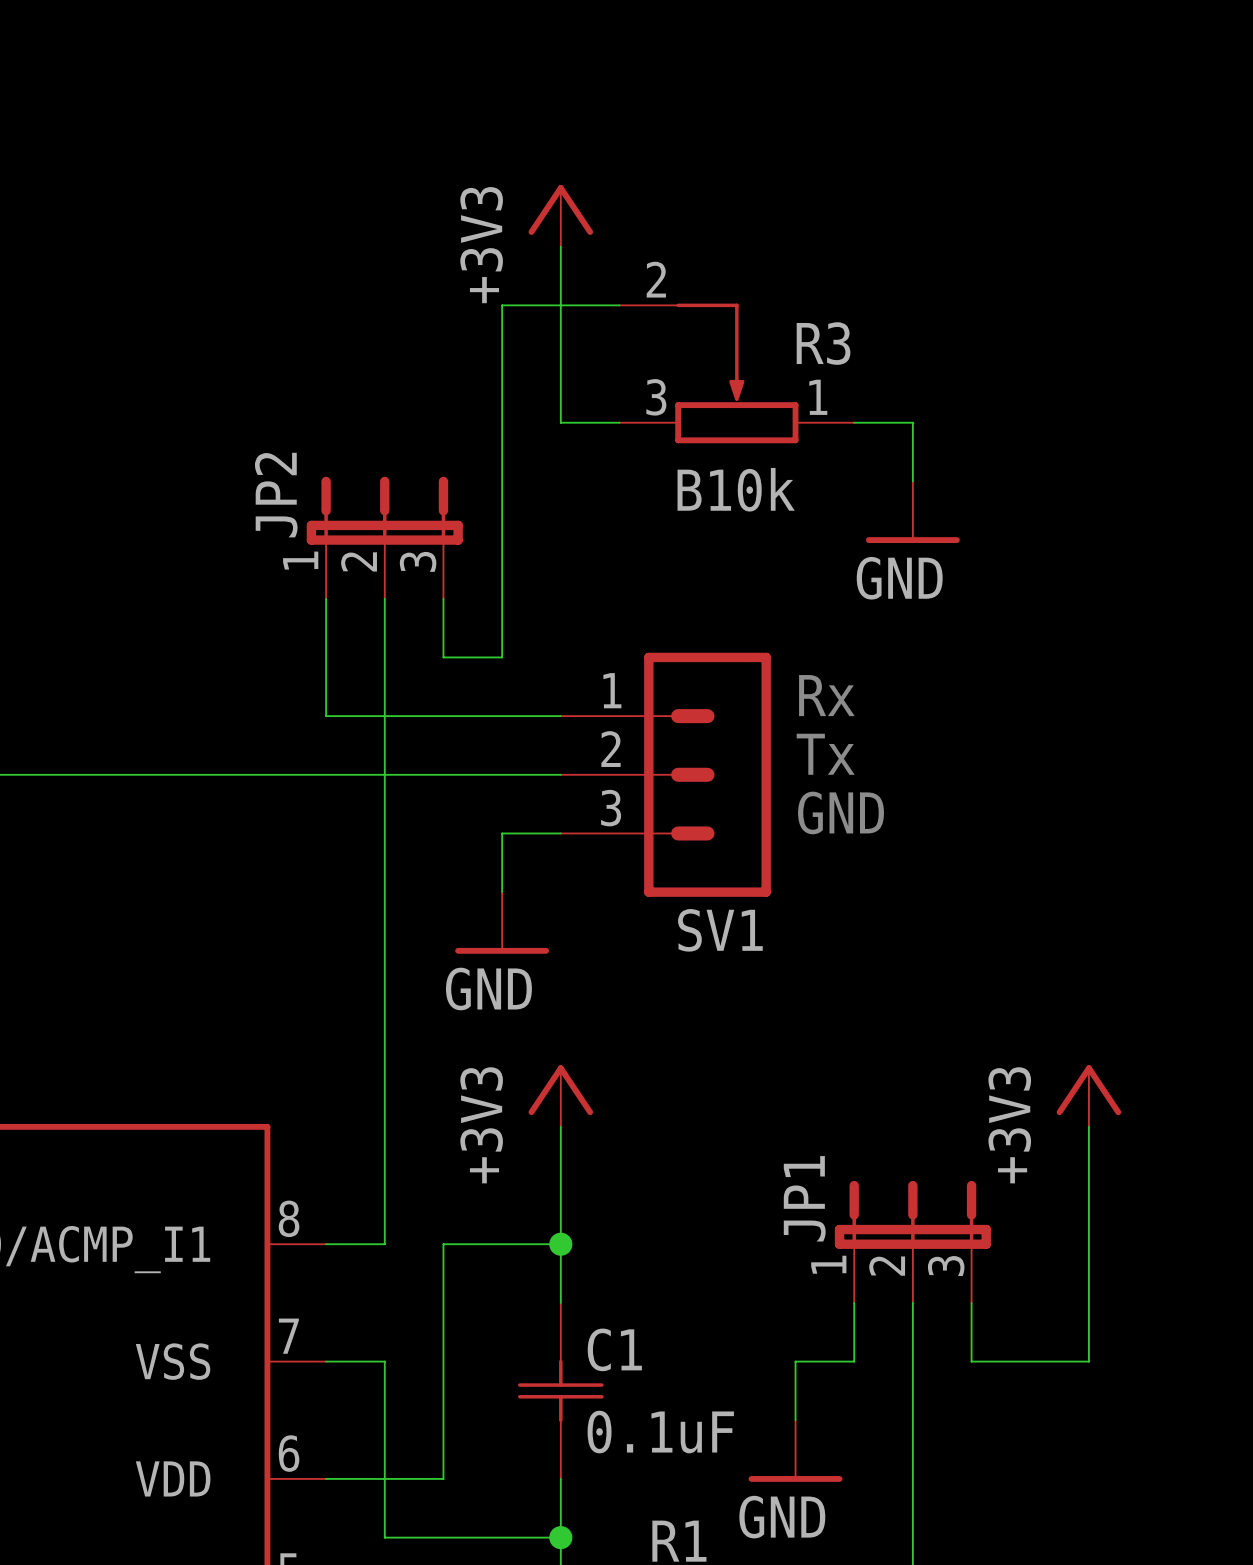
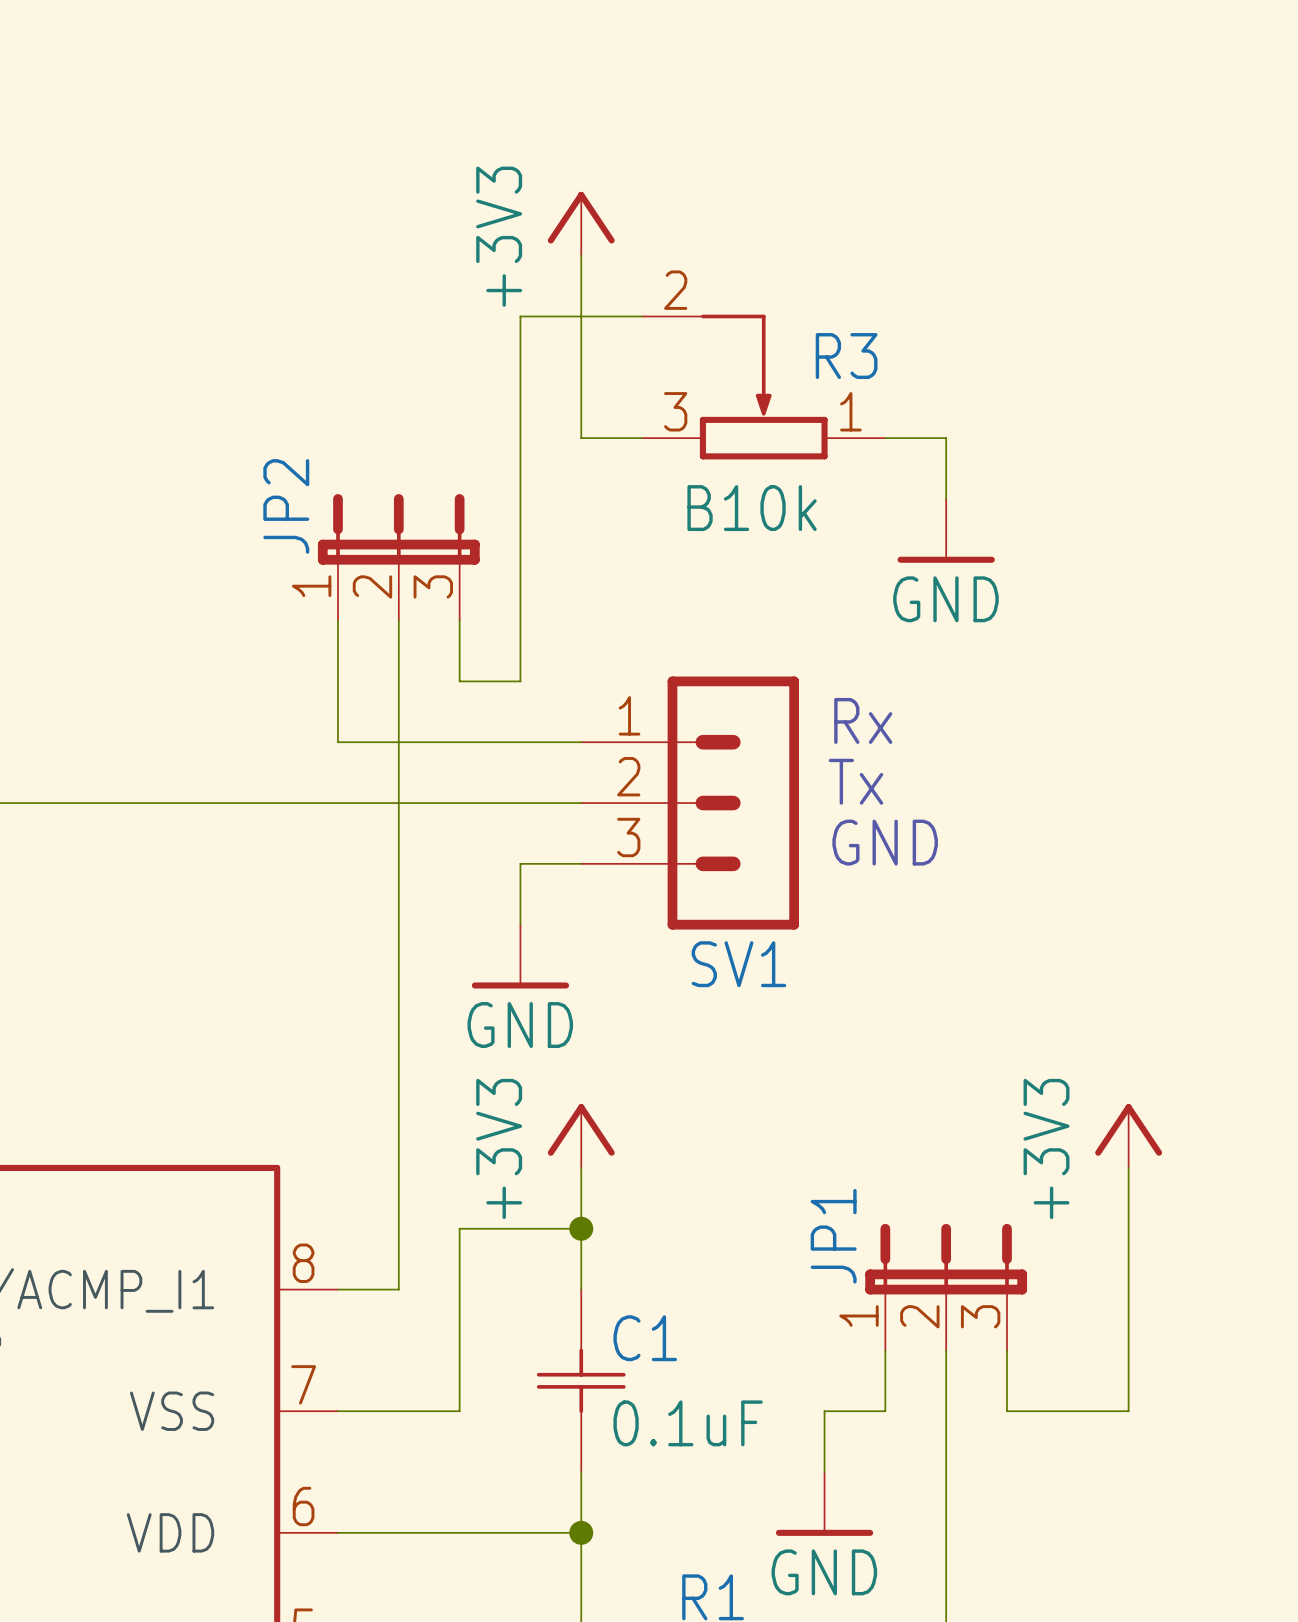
wire: (443, 1244) (560, 1244) (560, 1302) -> (459, 1289) (459, 1228) (581, 1228)
junction position: (560, 1244) -> (581, 1228)
wire: (384, 1361) (384, 1537) (560, 1537) -> (398, 1411) (459, 1411)
wire: (443, 1361) (443, 1478) -> (581, 1472) (581, 1532) (459, 1532)
C1 position: (560, 1390) -> (581, 1380)
junction position: (560, 1537) -> (581, 1532)

